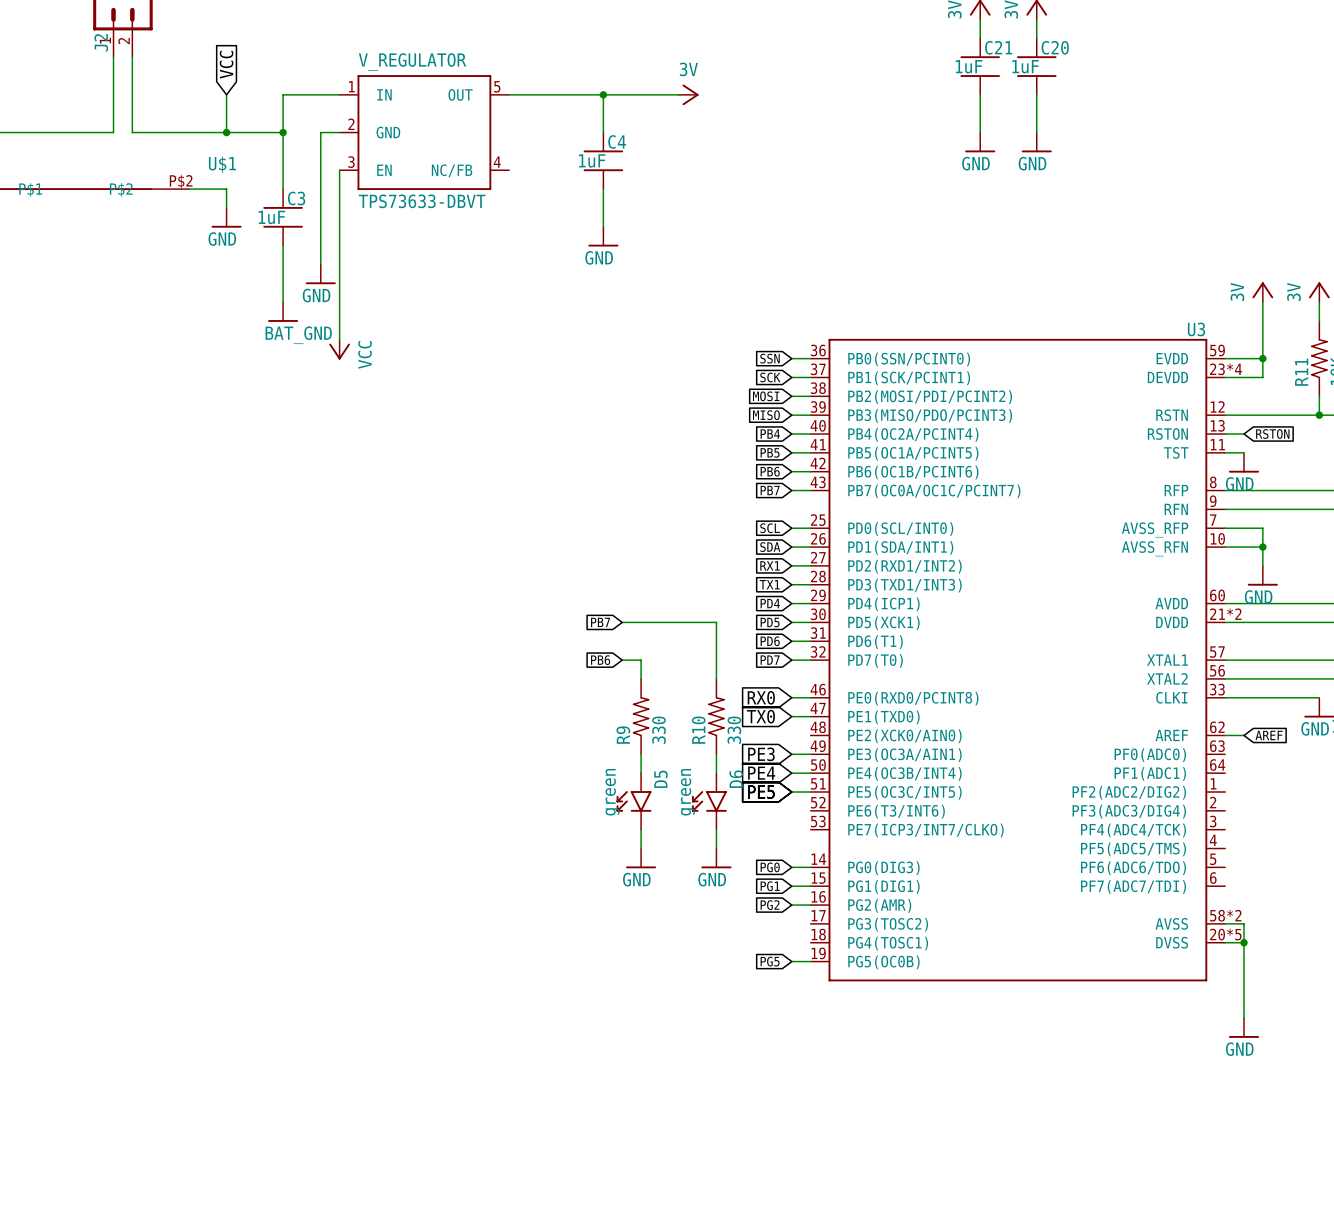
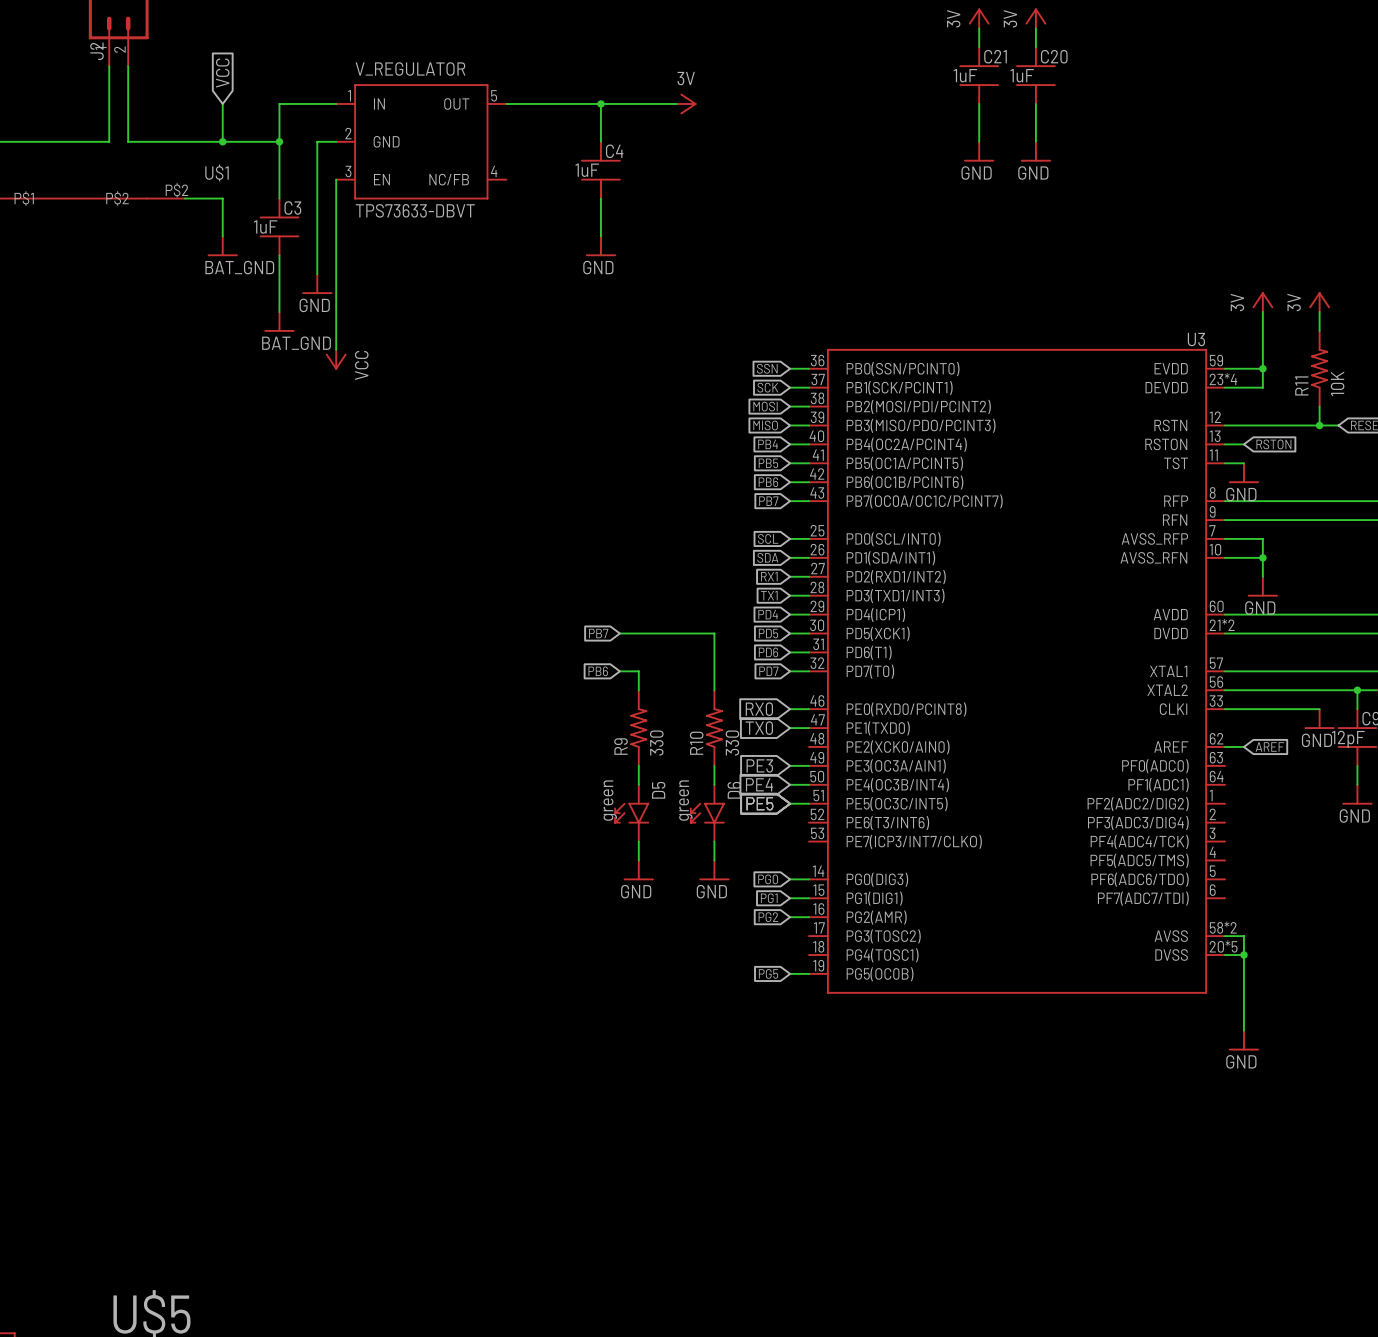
power symbol: GND (226, 217) -> none
power symbol: none -> BAT_GND (222, 246)

